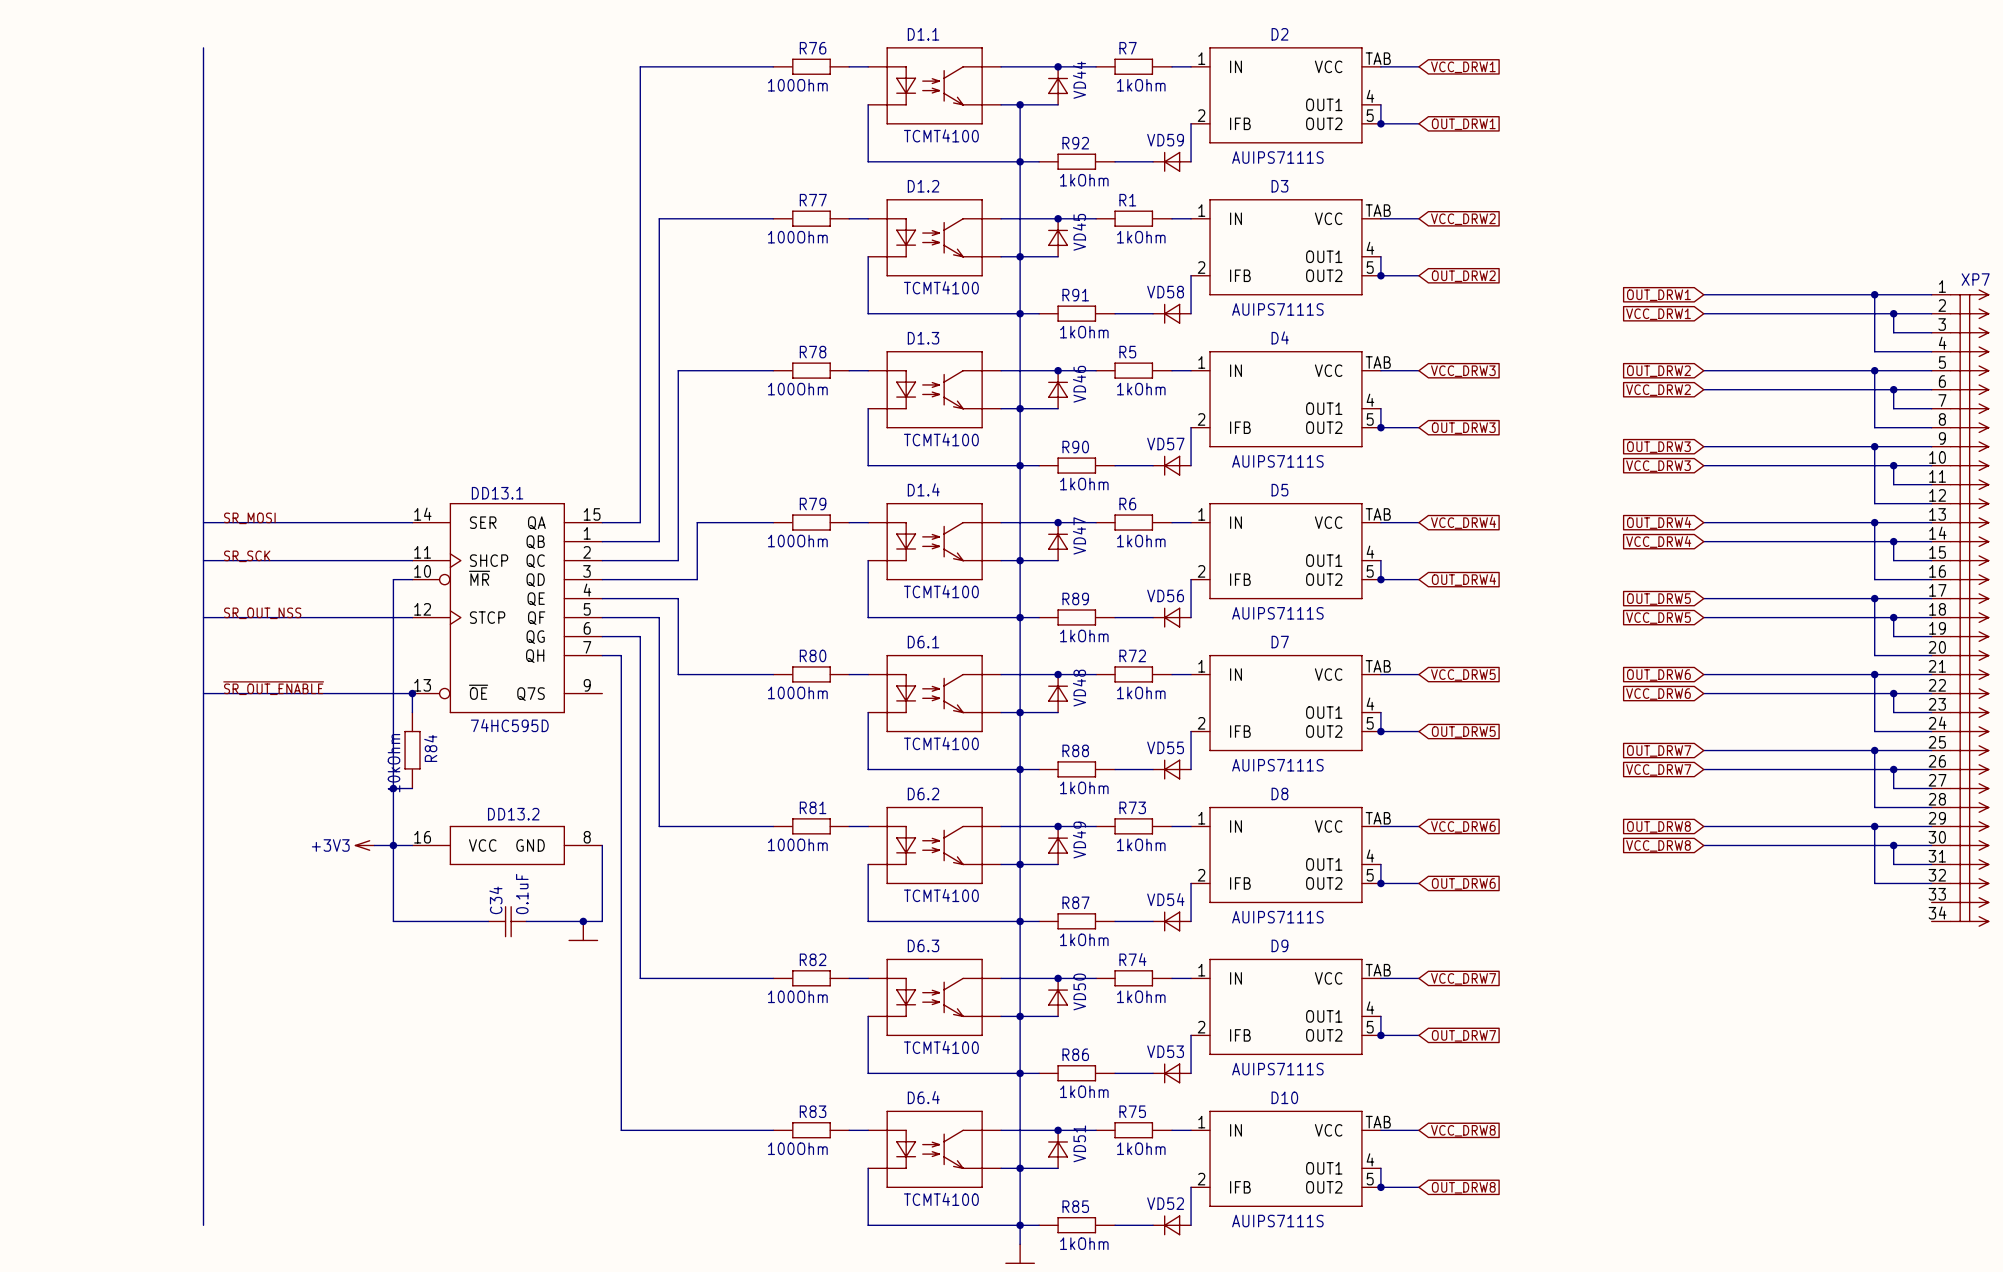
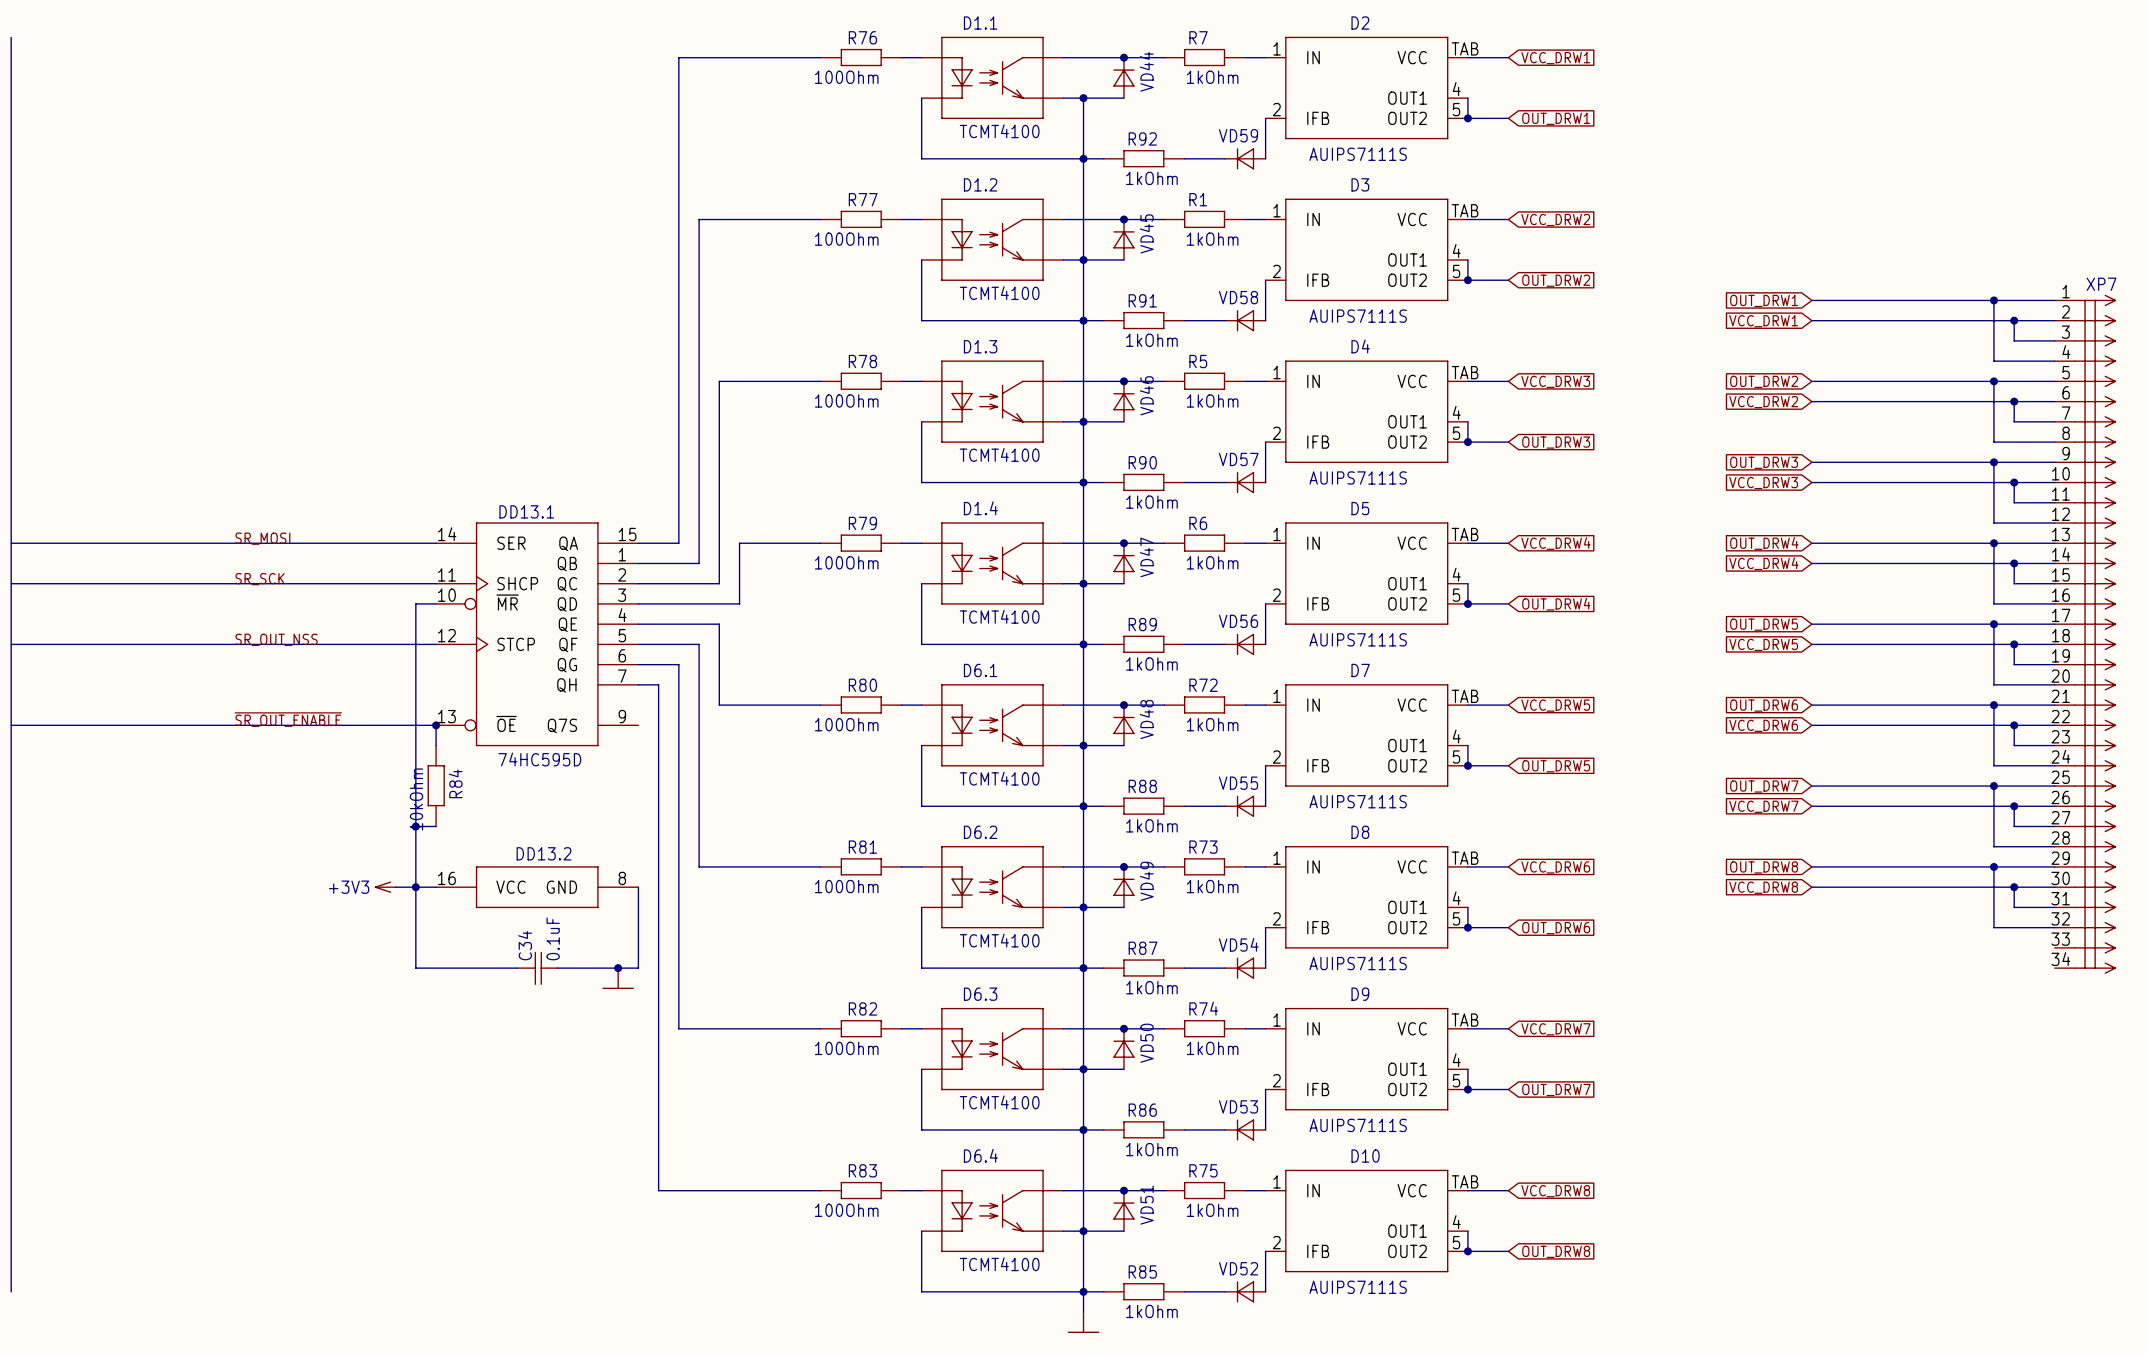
bus: none -> (11, 37) (11, 1291)
bus: (203, 47) (203, 1225) -> none
wire: none -> (11, 543) (213, 543)
wire: none -> (11, 583) (213, 583)
wire: none -> (11, 644) (213, 644)
wire: none -> (11, 725) (213, 725)

